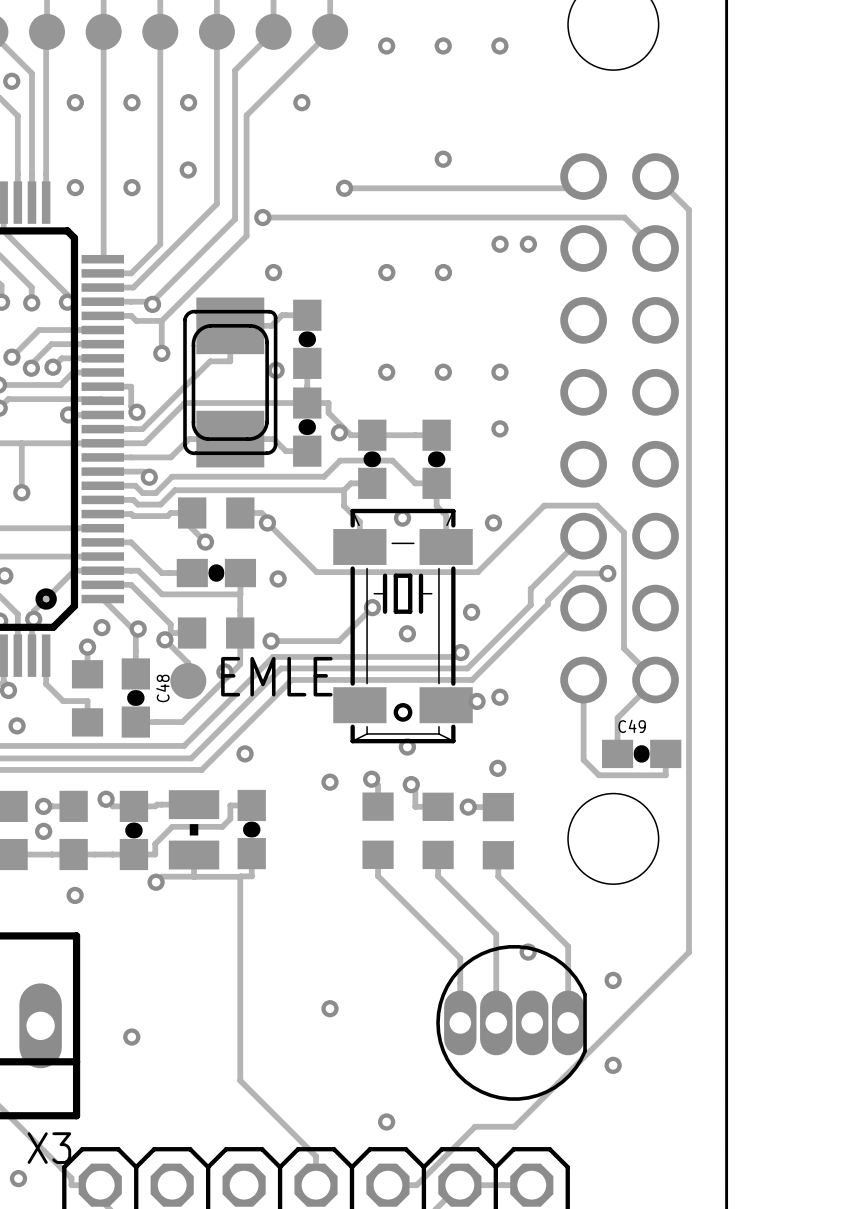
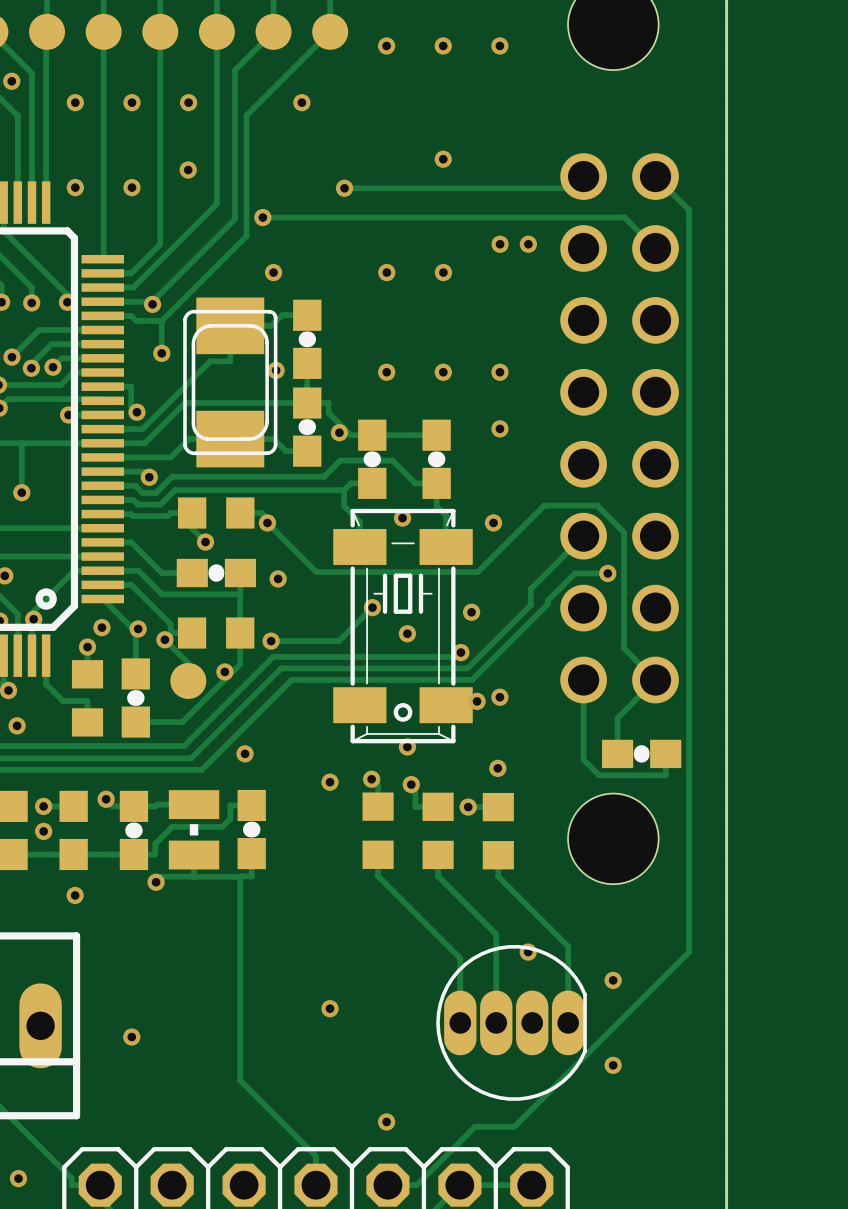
EMLE name: EMLE (276, 676) -> none
C48 name: C48 (162, 688) -> none
C49 name: C49 (632, 726) -> none
X3 name: X3 (49, 1148) -> none

